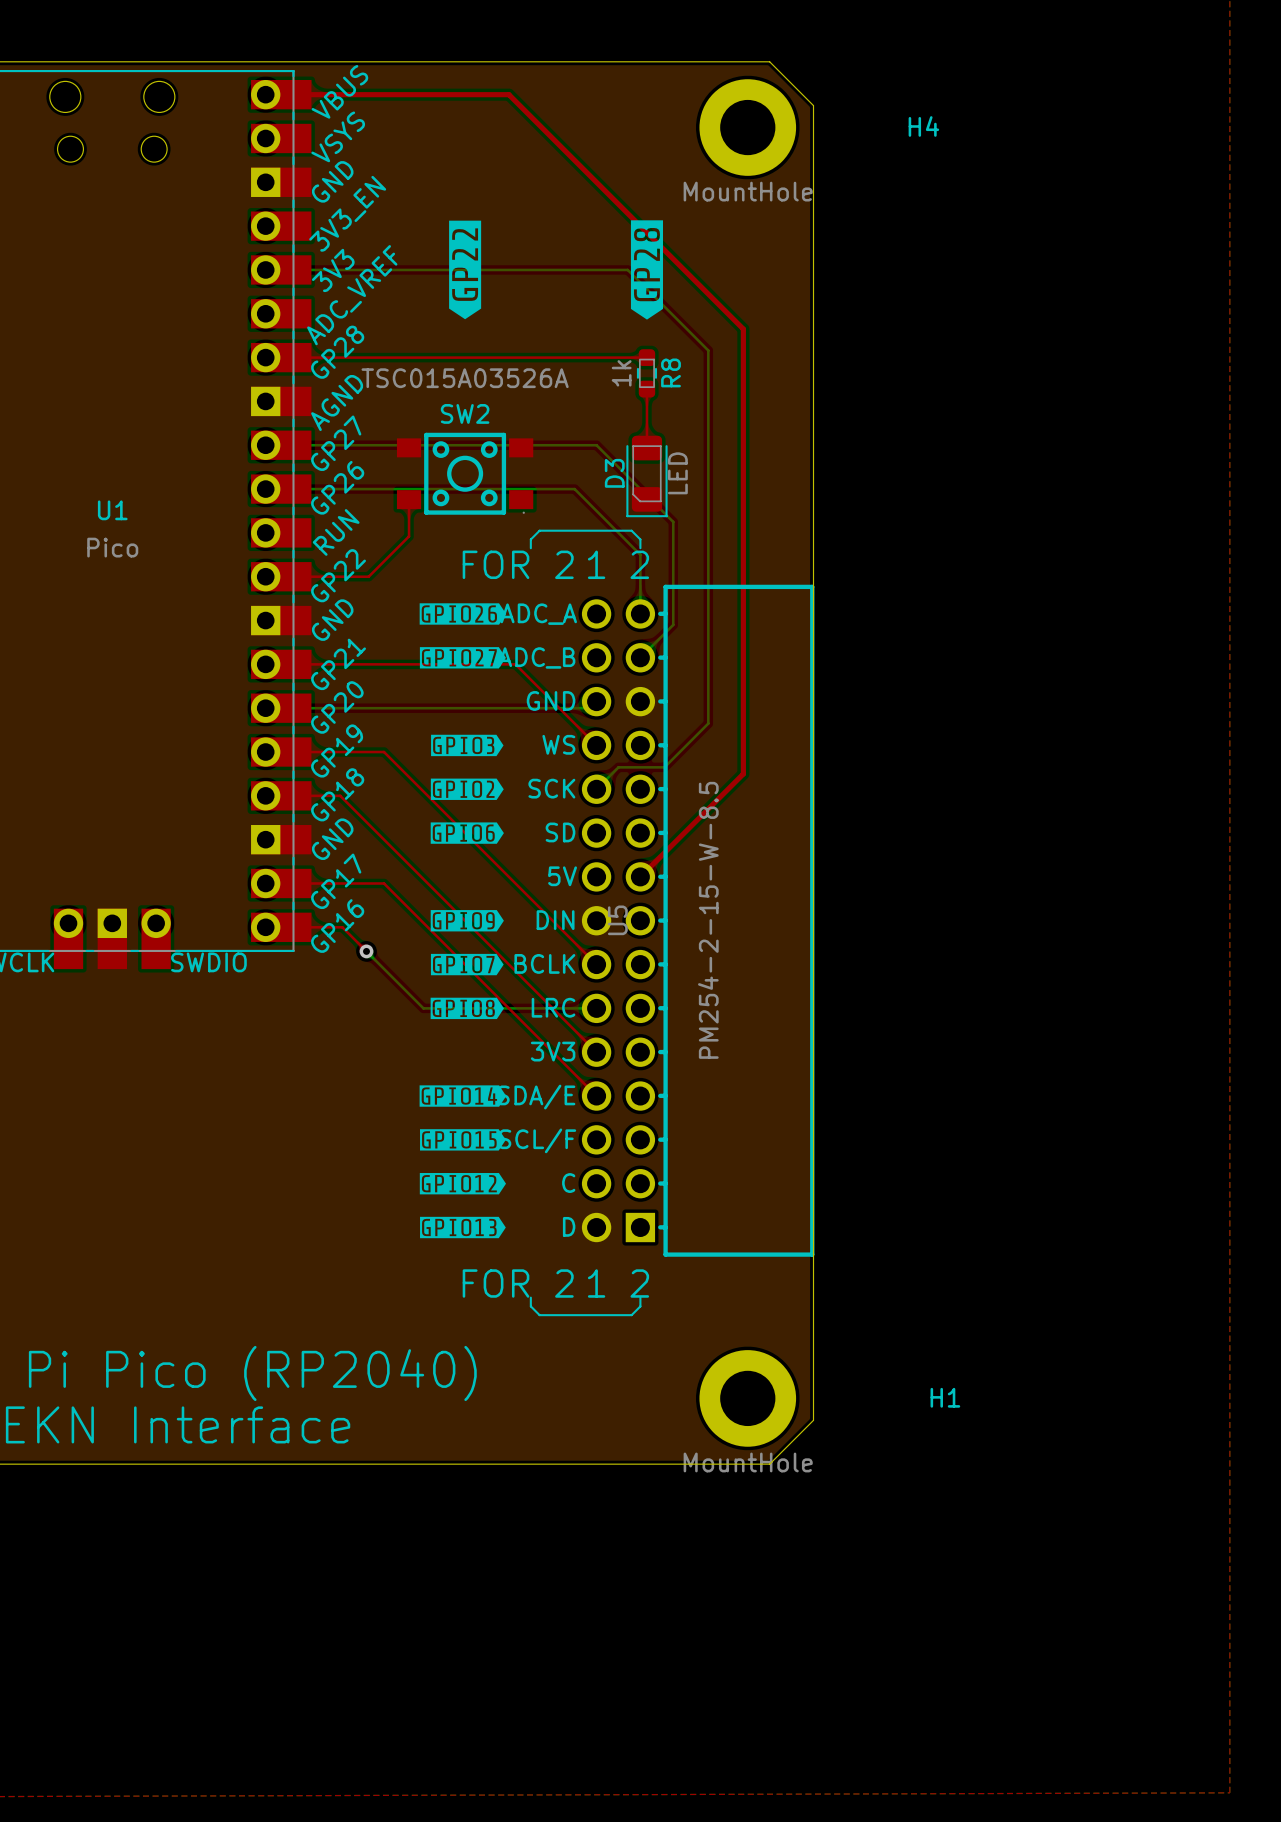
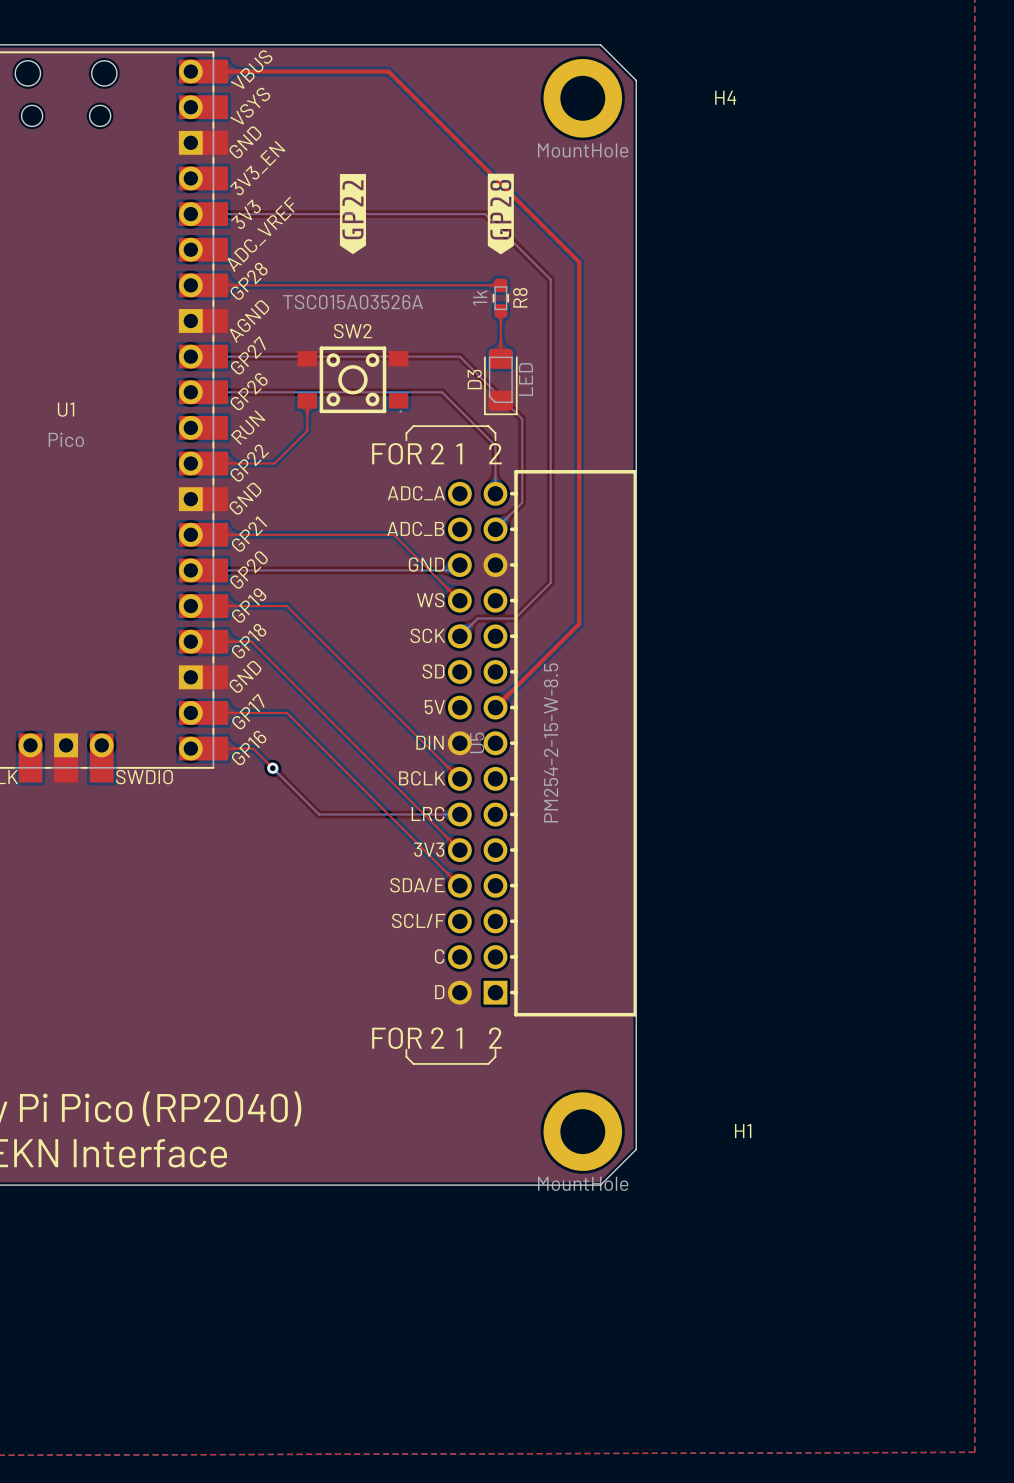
drawing: [419, 603, 507, 625] -> none
drawing: [419, 647, 506, 669] -> none
drawing: [431, 734, 504, 757] -> none
drawing: [430, 778, 504, 800] -> none
drawing: [430, 822, 504, 844] -> none
drawing: [430, 910, 504, 932] -> none
drawing: [430, 953, 504, 976] -> none
drawing: [430, 997, 504, 1020] -> none
drawing: [419, 1085, 507, 1107] -> none
drawing: [420, 1129, 506, 1151] -> none
drawing: [419, 1173, 507, 1195] -> none
drawing: [420, 1216, 506, 1239] -> none

